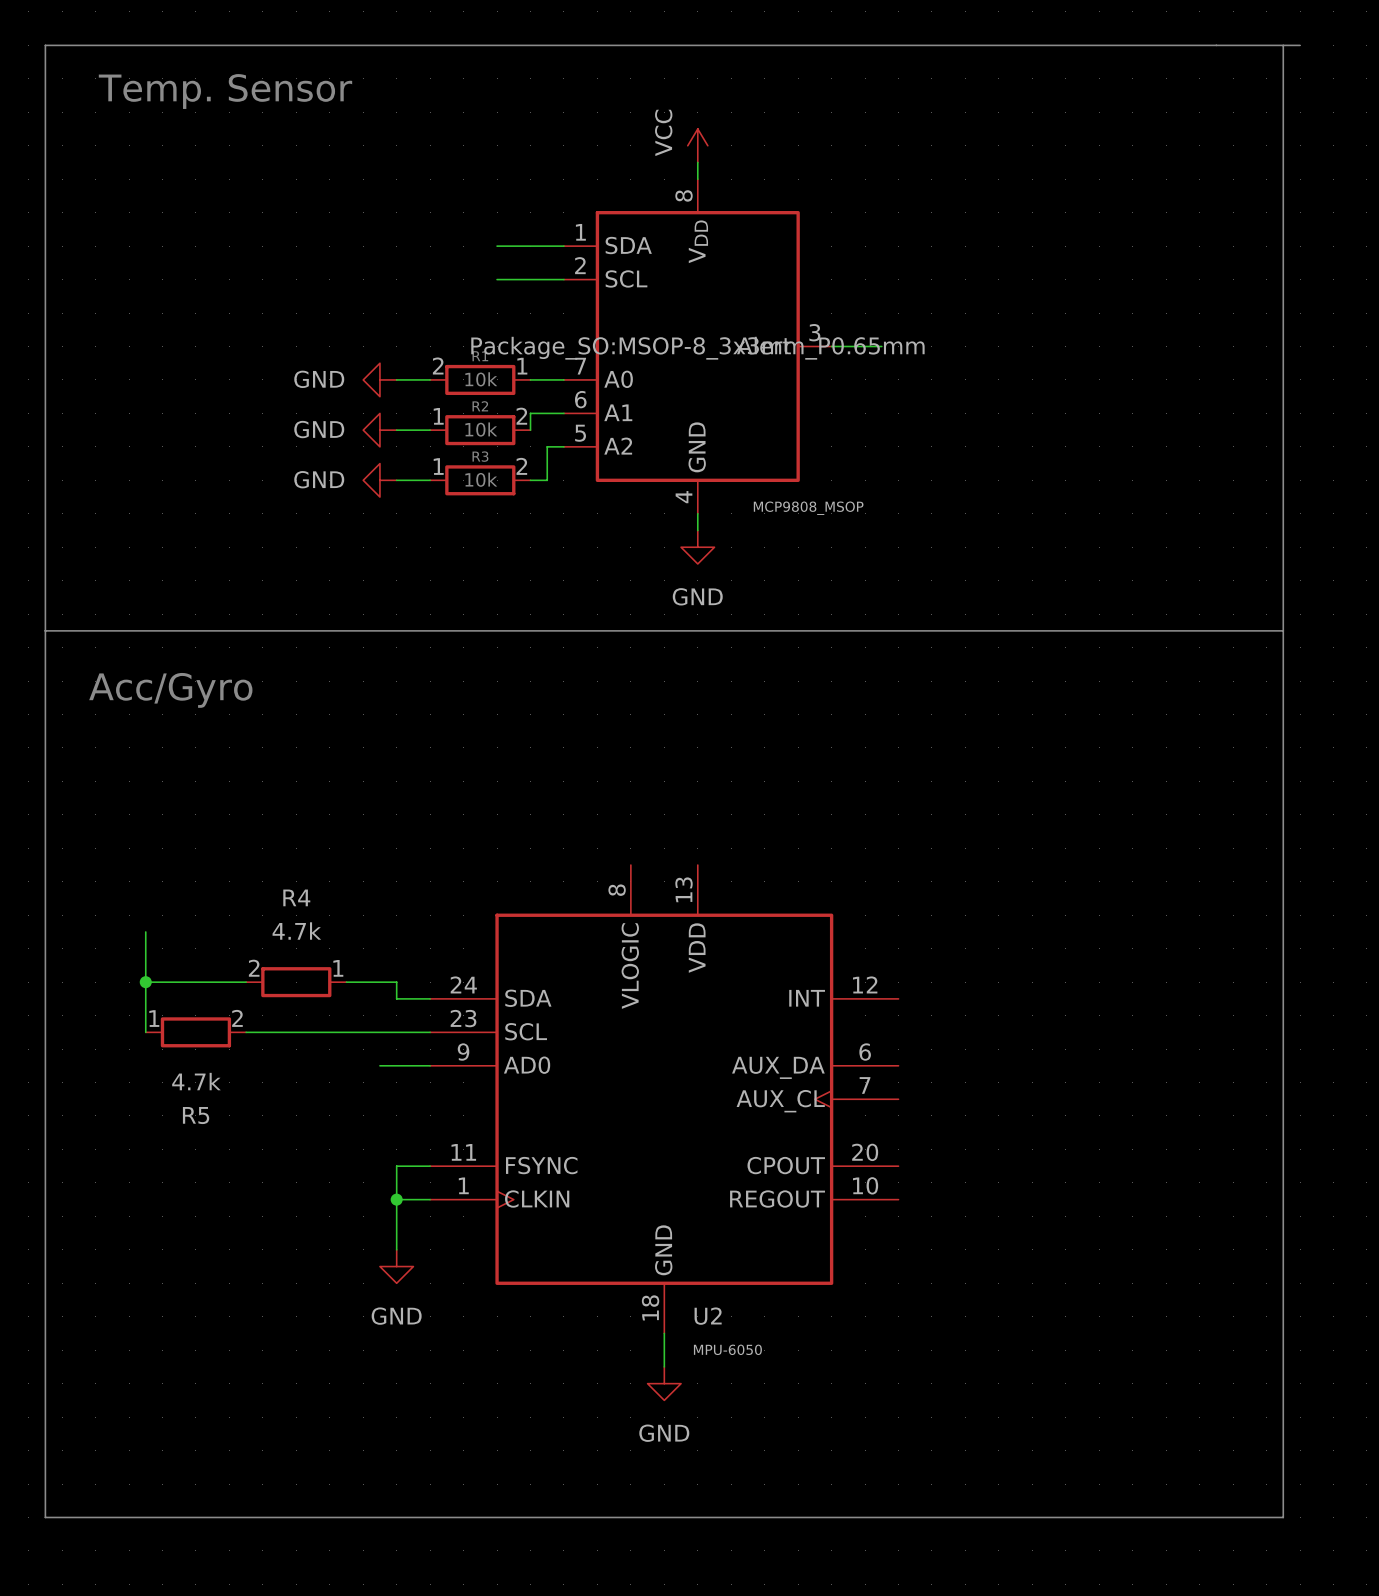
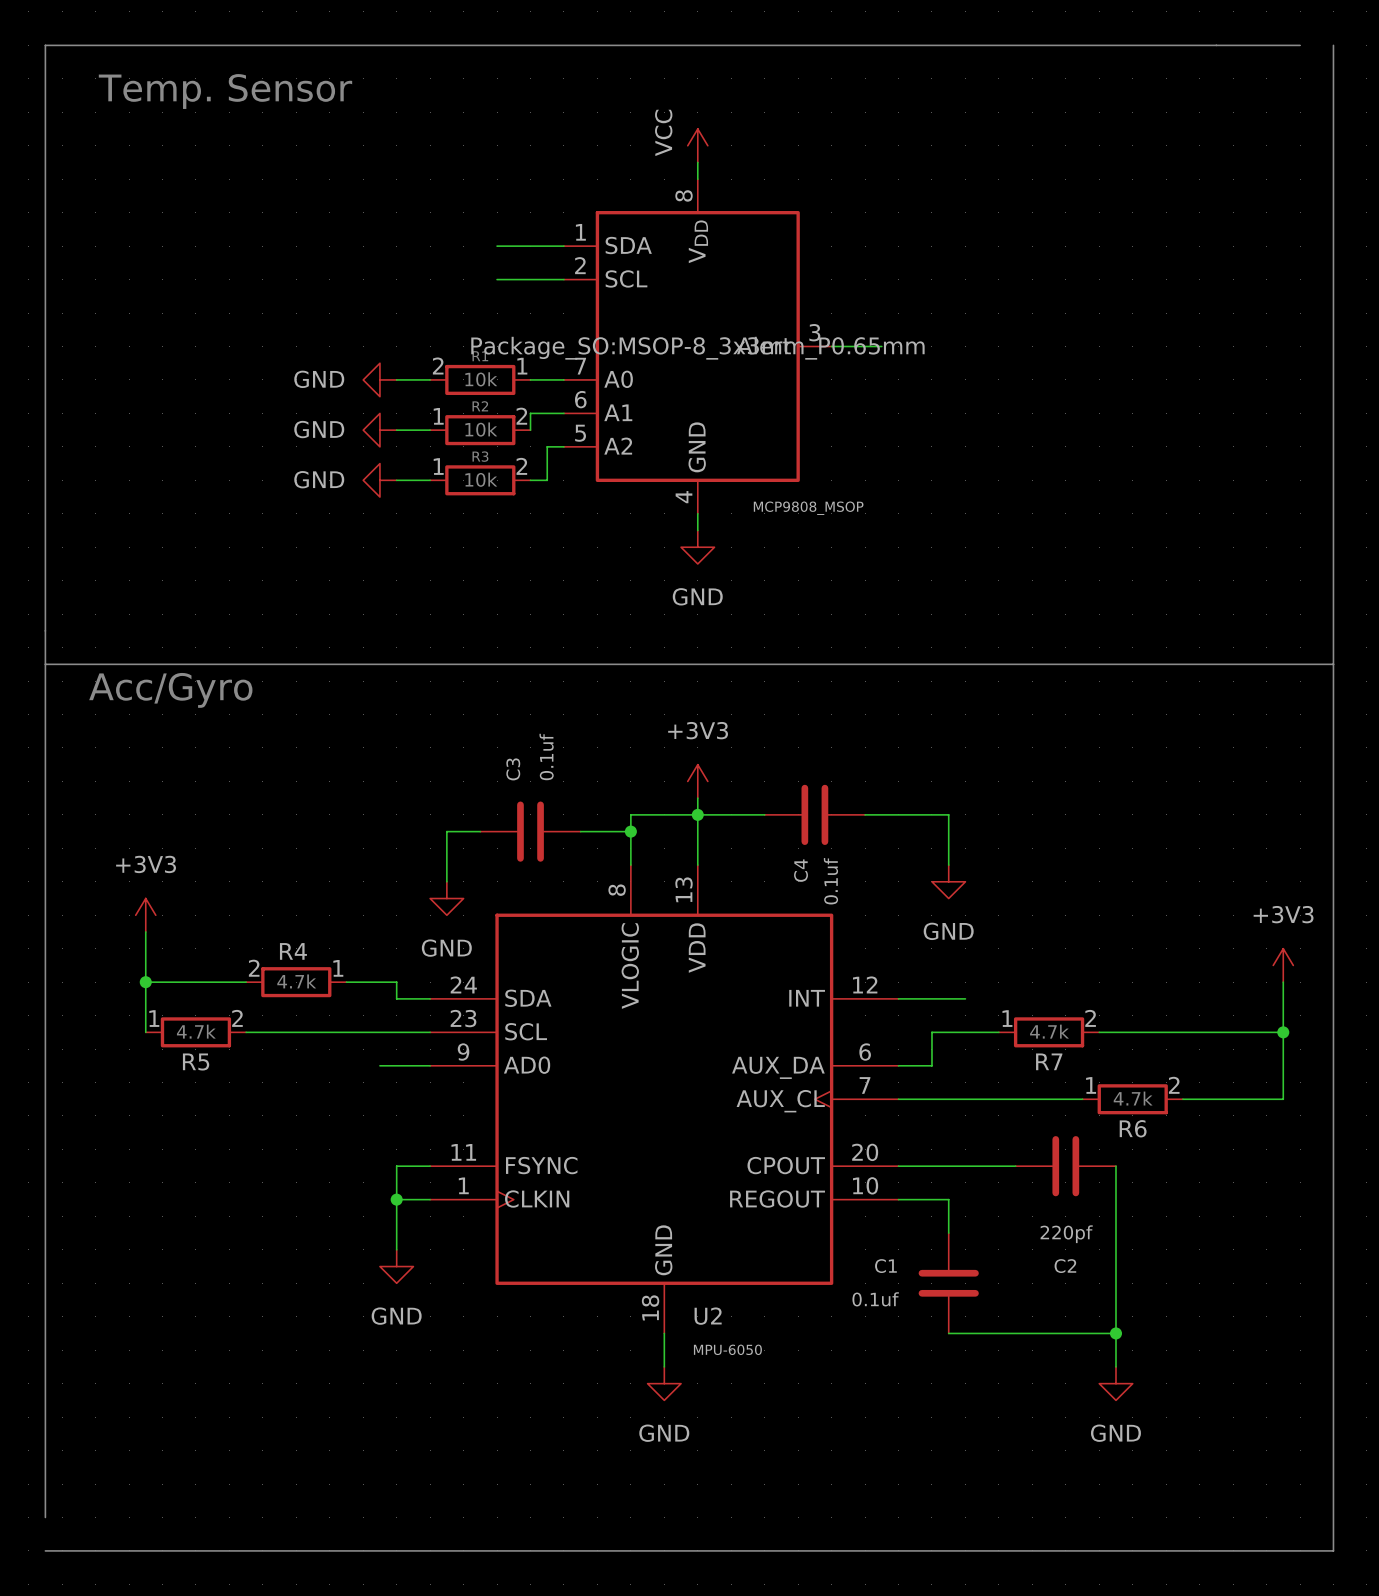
line: (1283, 45) (1283, 1517) (45, 1517) -> none
line: none -> (1333, 45) (1333, 1550) (45, 1550)
line: (45, 630) (1283, 630) -> none
line: none -> (45, 664) (1333, 664)
power symbol: none -> +3V3 (697, 781)
wire: none -> (697, 798) (697, 865)
junction: none -> (697, 814)
wire: none -> (764, 814) (630, 814) (630, 865)
C4: none -> 0.1uf (814, 814)
wire: none -> (865, 814) (948, 814) (948, 865)
wire: none -> (480, 831) (446, 831) (446, 881)
C3: none -> 0.1uf (530, 831)
wire: none -> (580, 831) (630, 831)
junction: none -> (630, 831)
power symbol: none -> GND (948, 881)
R4 name position: R4 (296, 897) -> R4 (293, 951)
power symbol: none -> GND (446, 898)
power symbol: none -> +3V3 (145, 915)
R4 value: 4.7k (296, 931) -> none
power symbol: none -> +3V3 (1283, 965)
text: none -> 4.7k (296, 981)
wire: none -> (1283, 982) (1283, 1099) (1182, 1099)
wire: none -> (898, 998) (965, 998)
text: none -> 4.7k (196, 1031)
text: none -> 4.7k (1049, 1031)
wire: none -> (998, 1032) (931, 1032) (931, 1065) (898, 1065)
R7: none -> (1049, 1032)
wire: none -> (1099, 1032) (1283, 1032)
junction: none -> (1283, 1032)
R5 value: 4.7k (196, 1081) -> none
text: none -> 4.7k (1133, 1098)
wire: none -> (898, 1099) (1082, 1099)
R6: none -> (1132, 1099)
R5 name position: R5 (196, 1115) -> R5 (196, 1062)
wire: none -> (898, 1166) (1015, 1166)
C2: none -> 220pf (1065, 1166)
wire: none -> (1115, 1166) (1115, 1366)
wire: none -> (898, 1199) (948, 1199) (948, 1233)
C1: none -> 0.1uf (948, 1283)
wire: none -> (948, 1333) (1115, 1333)
junction: none -> (1115, 1333)
power symbol: none -> GND (1115, 1383)

